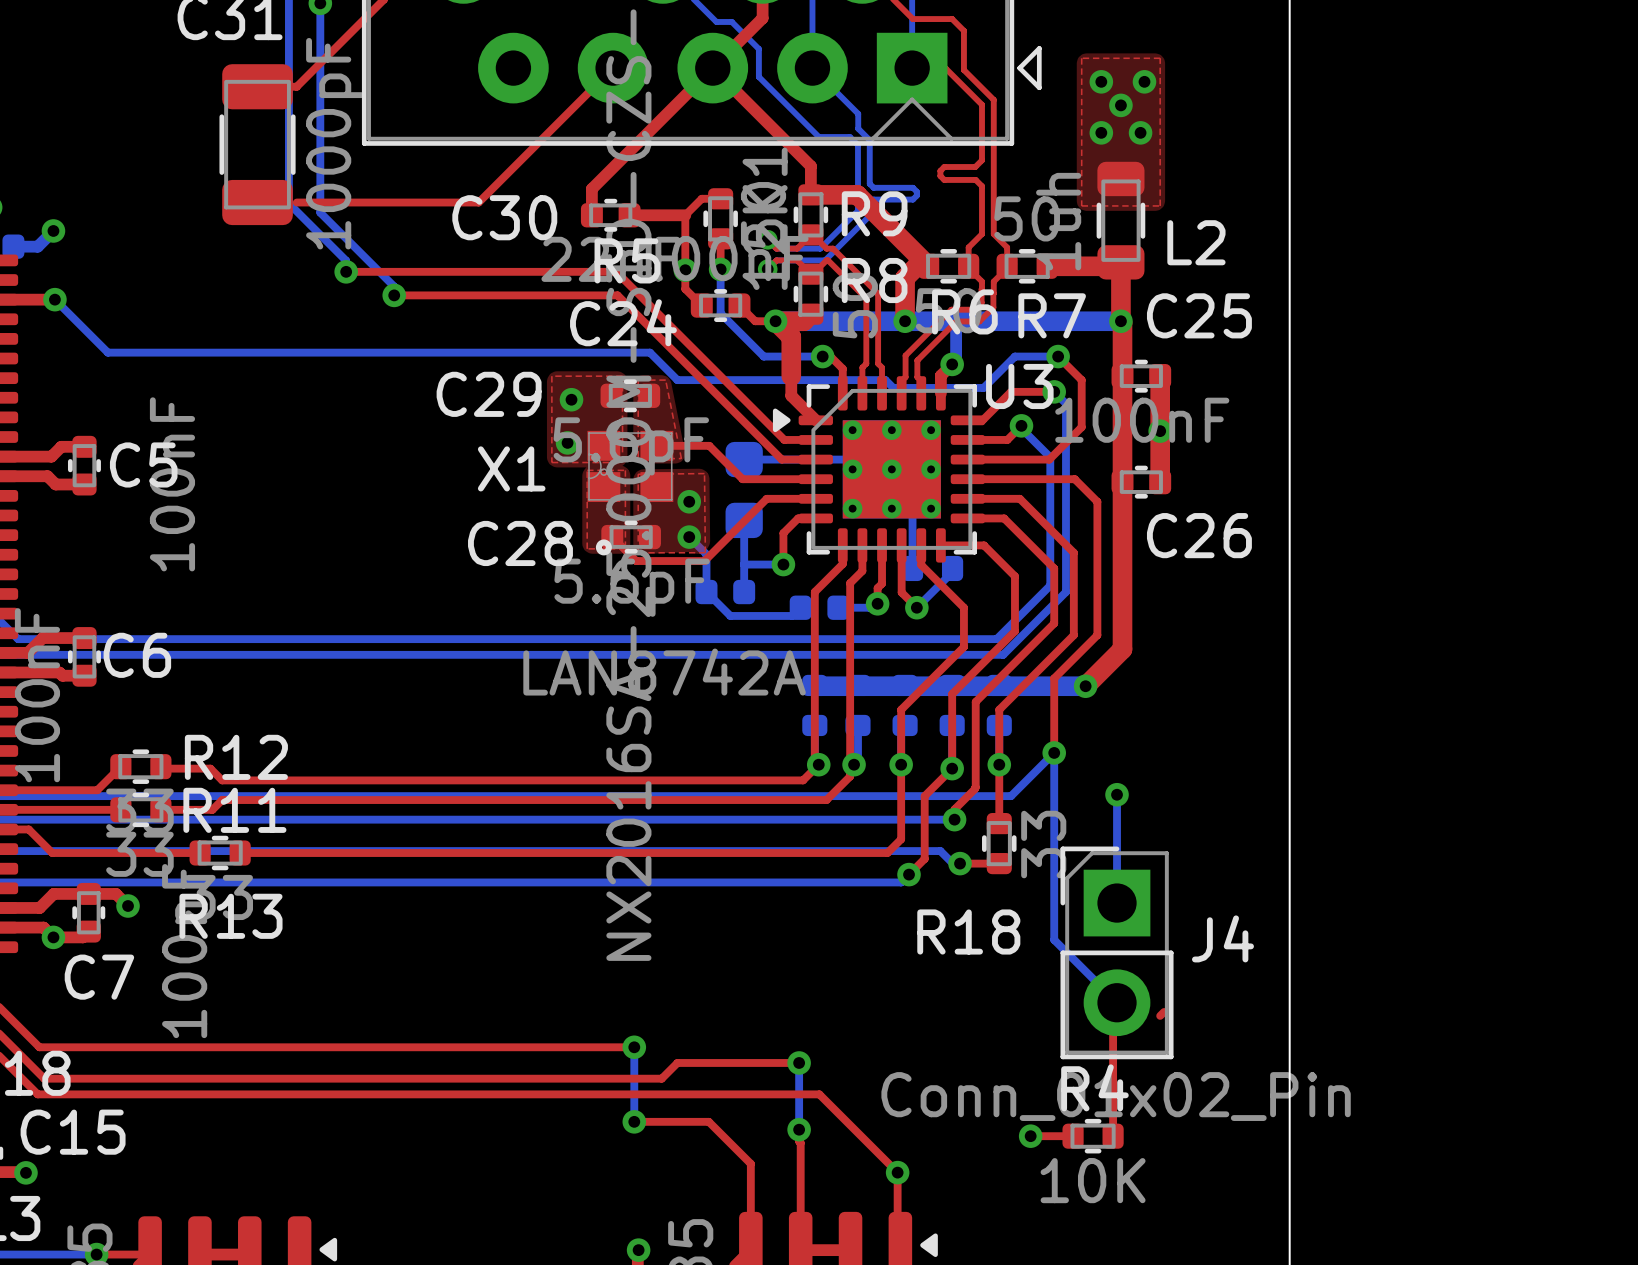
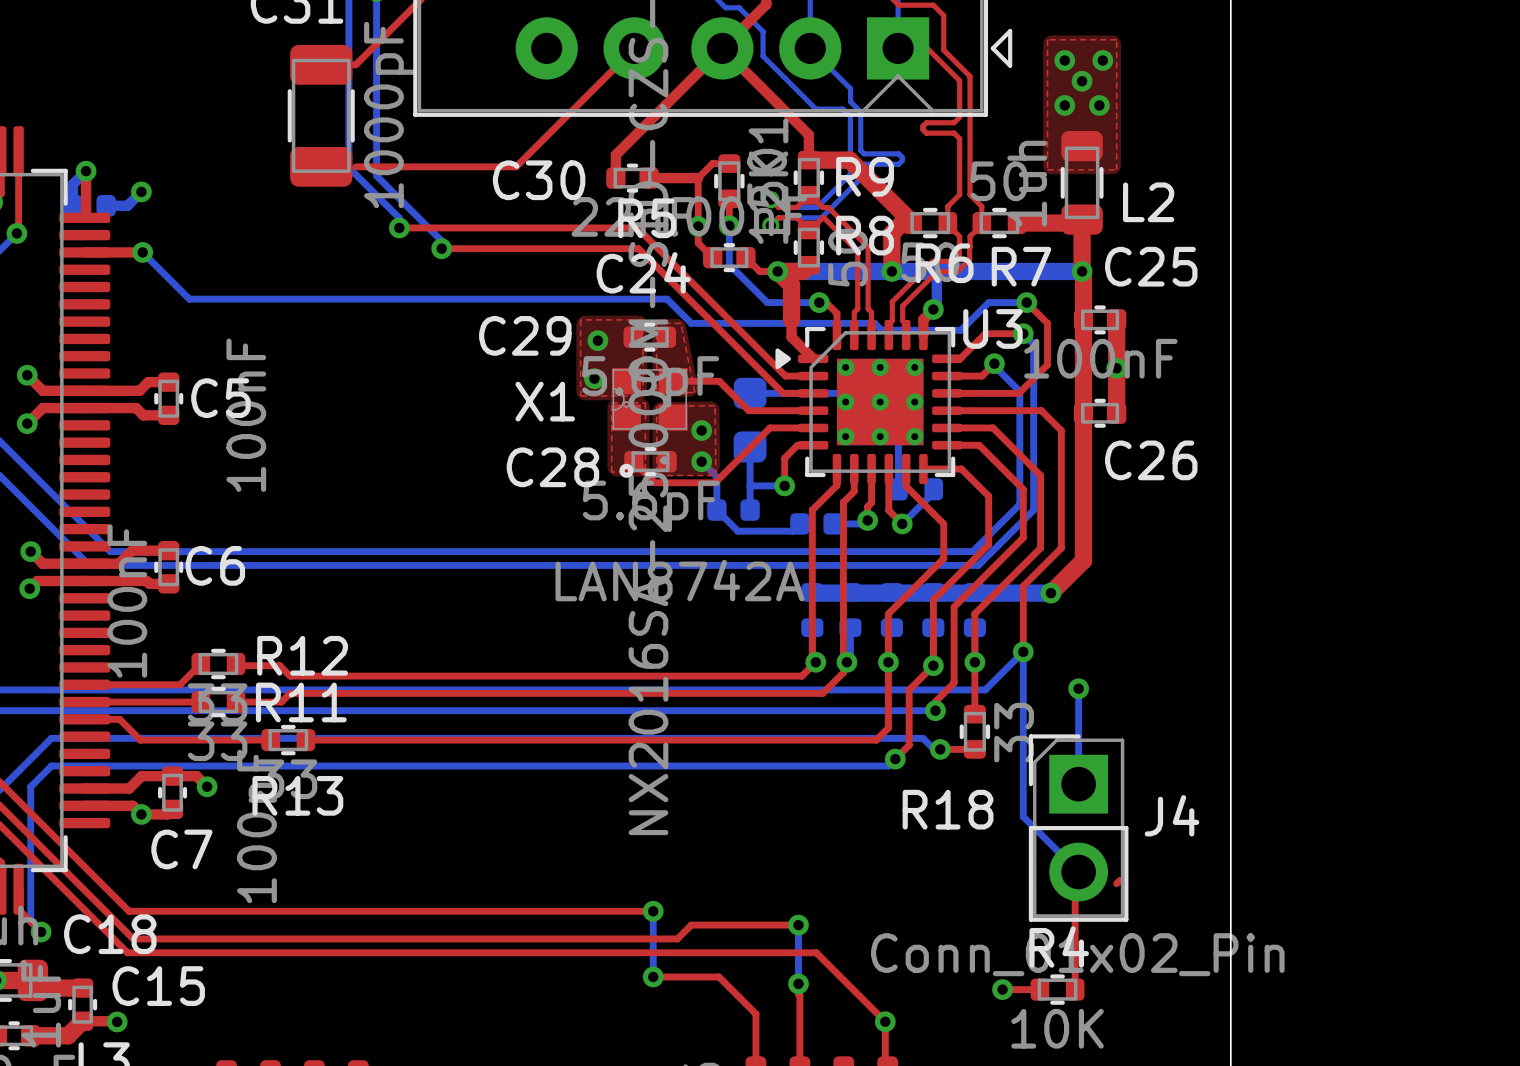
top track: (982, 146) (982, 160) (975, 167) (944, 167) (940, 170) (940, 176) (944, 179) (975, 179) (982, 186) -> (959, 117) (954, 122) (926, 122) (923, 126) (923, 129) (926, 133) (954, 133) (959, 138) (959, 152)

